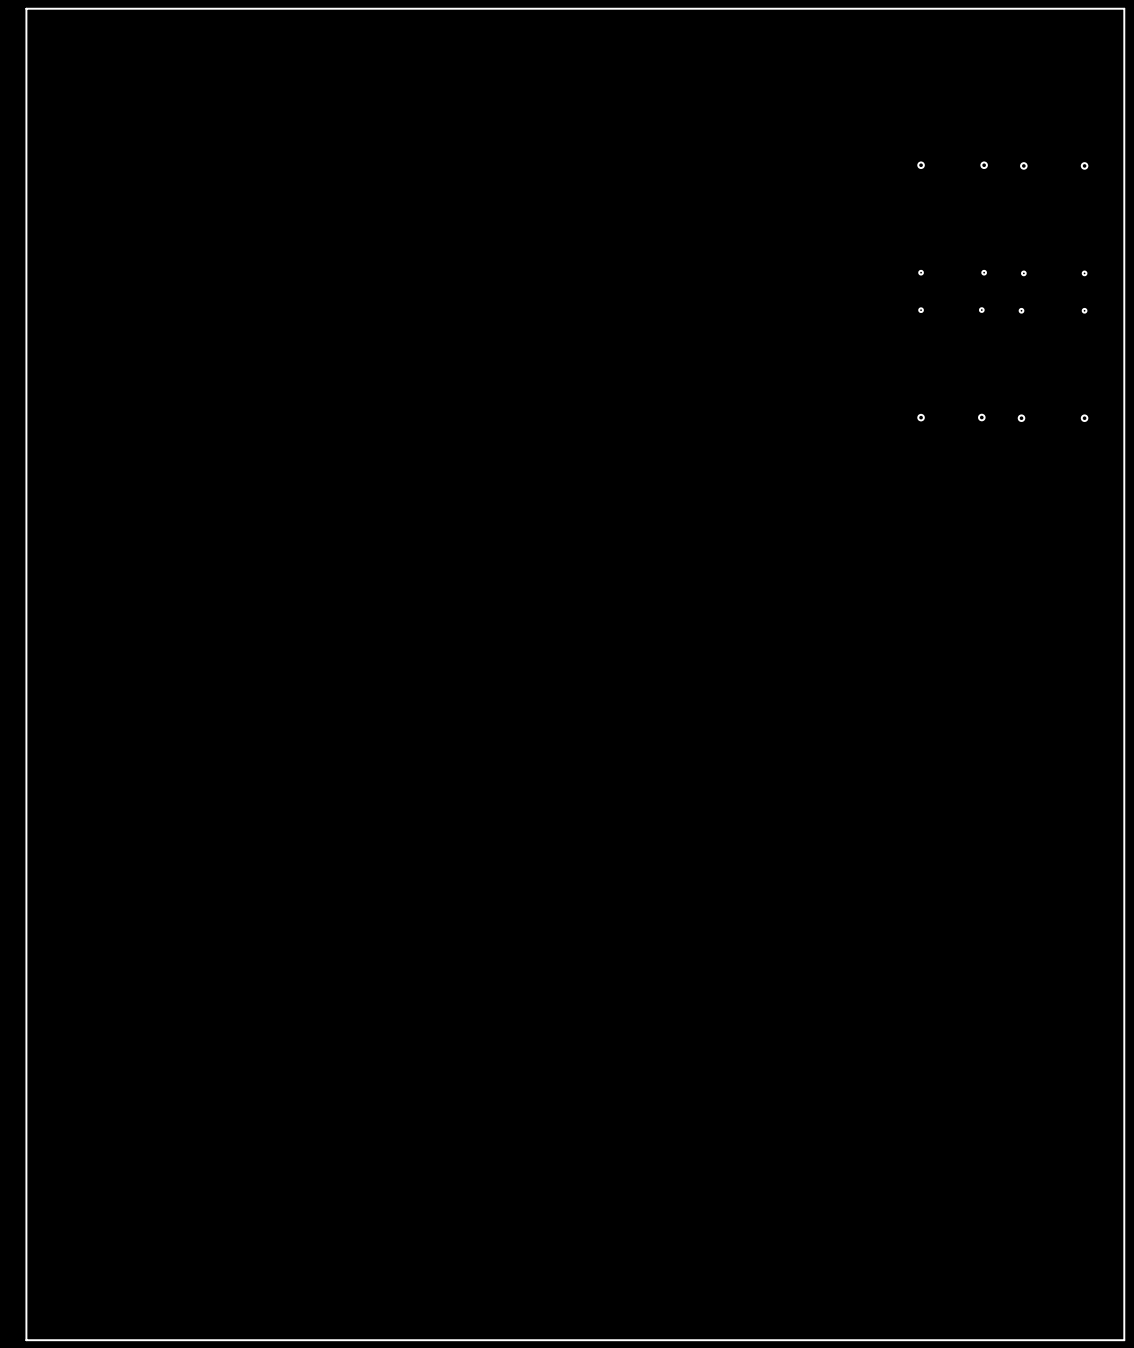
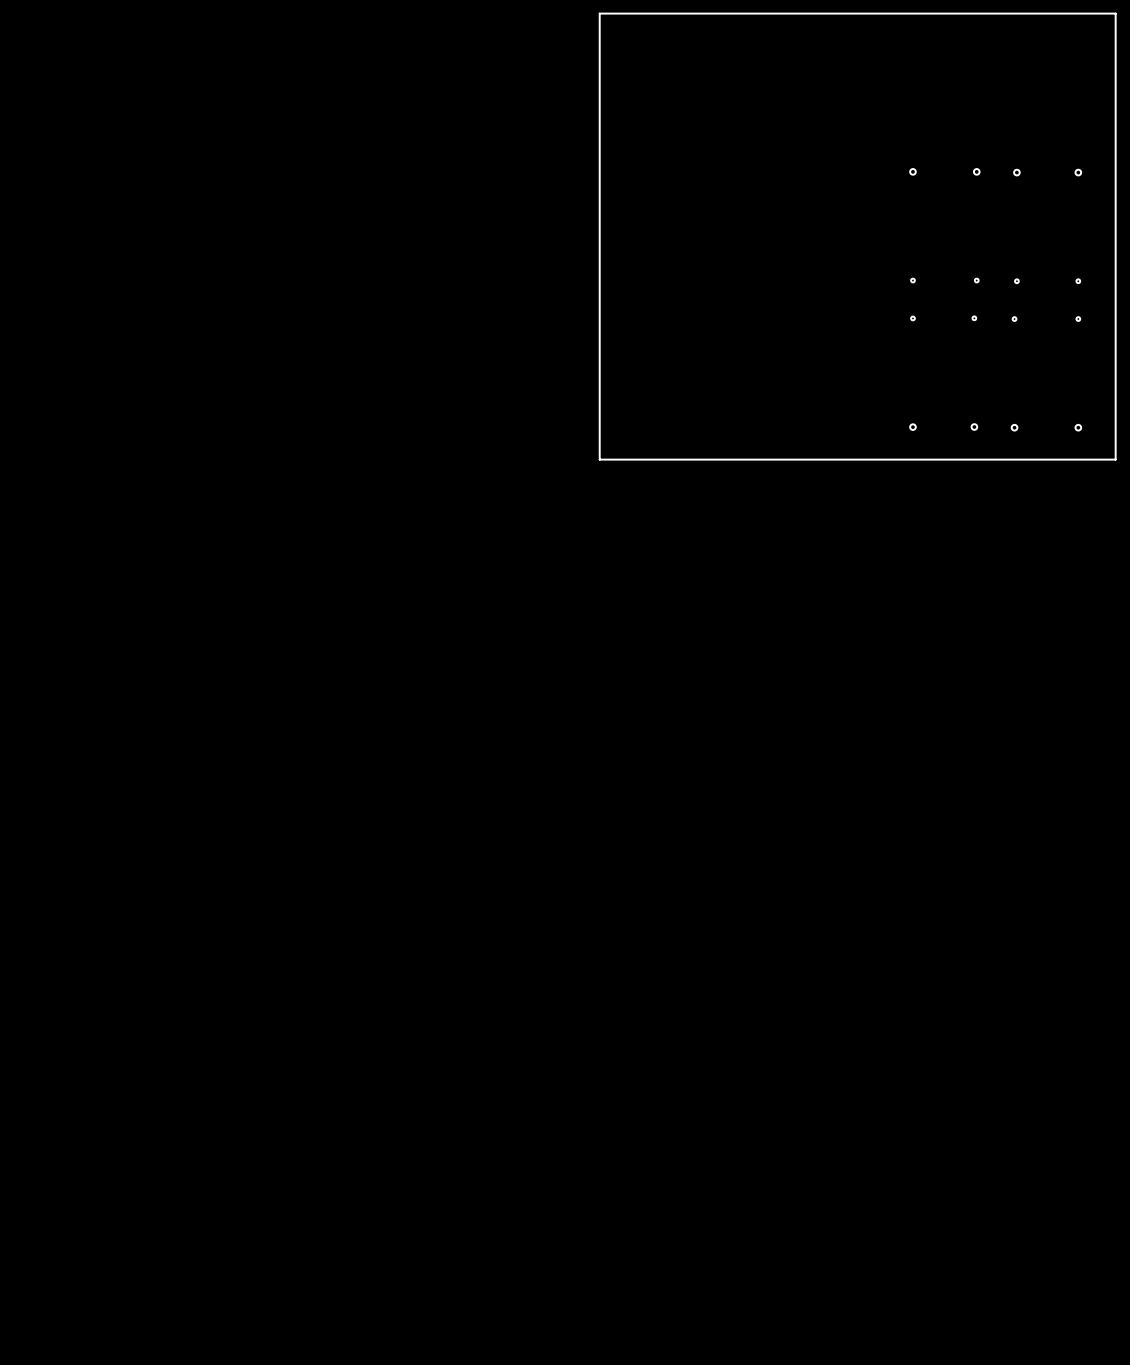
board edge: (1121, 8) (1124, 8) (1124, 1340) (26, 1340) (26, 8) (611, 8) -> (1115, 13) (1115, 459) (599, 459) (599, 13)

